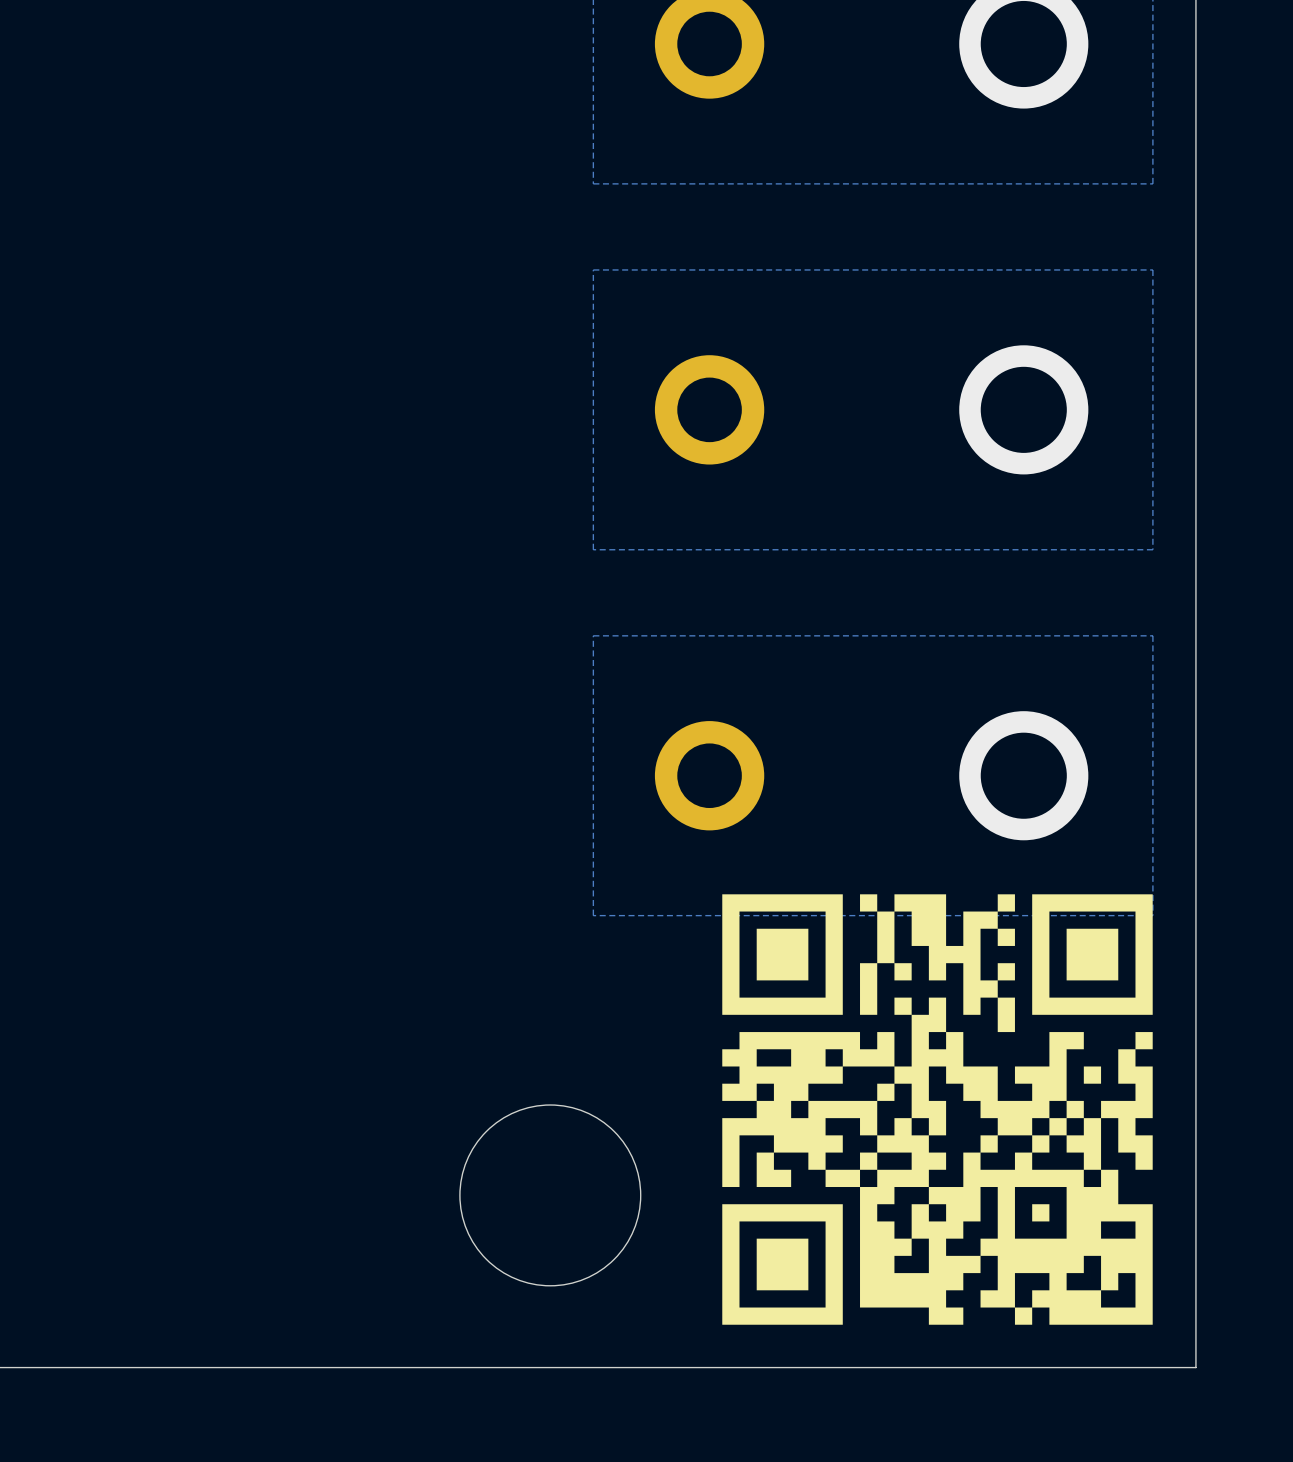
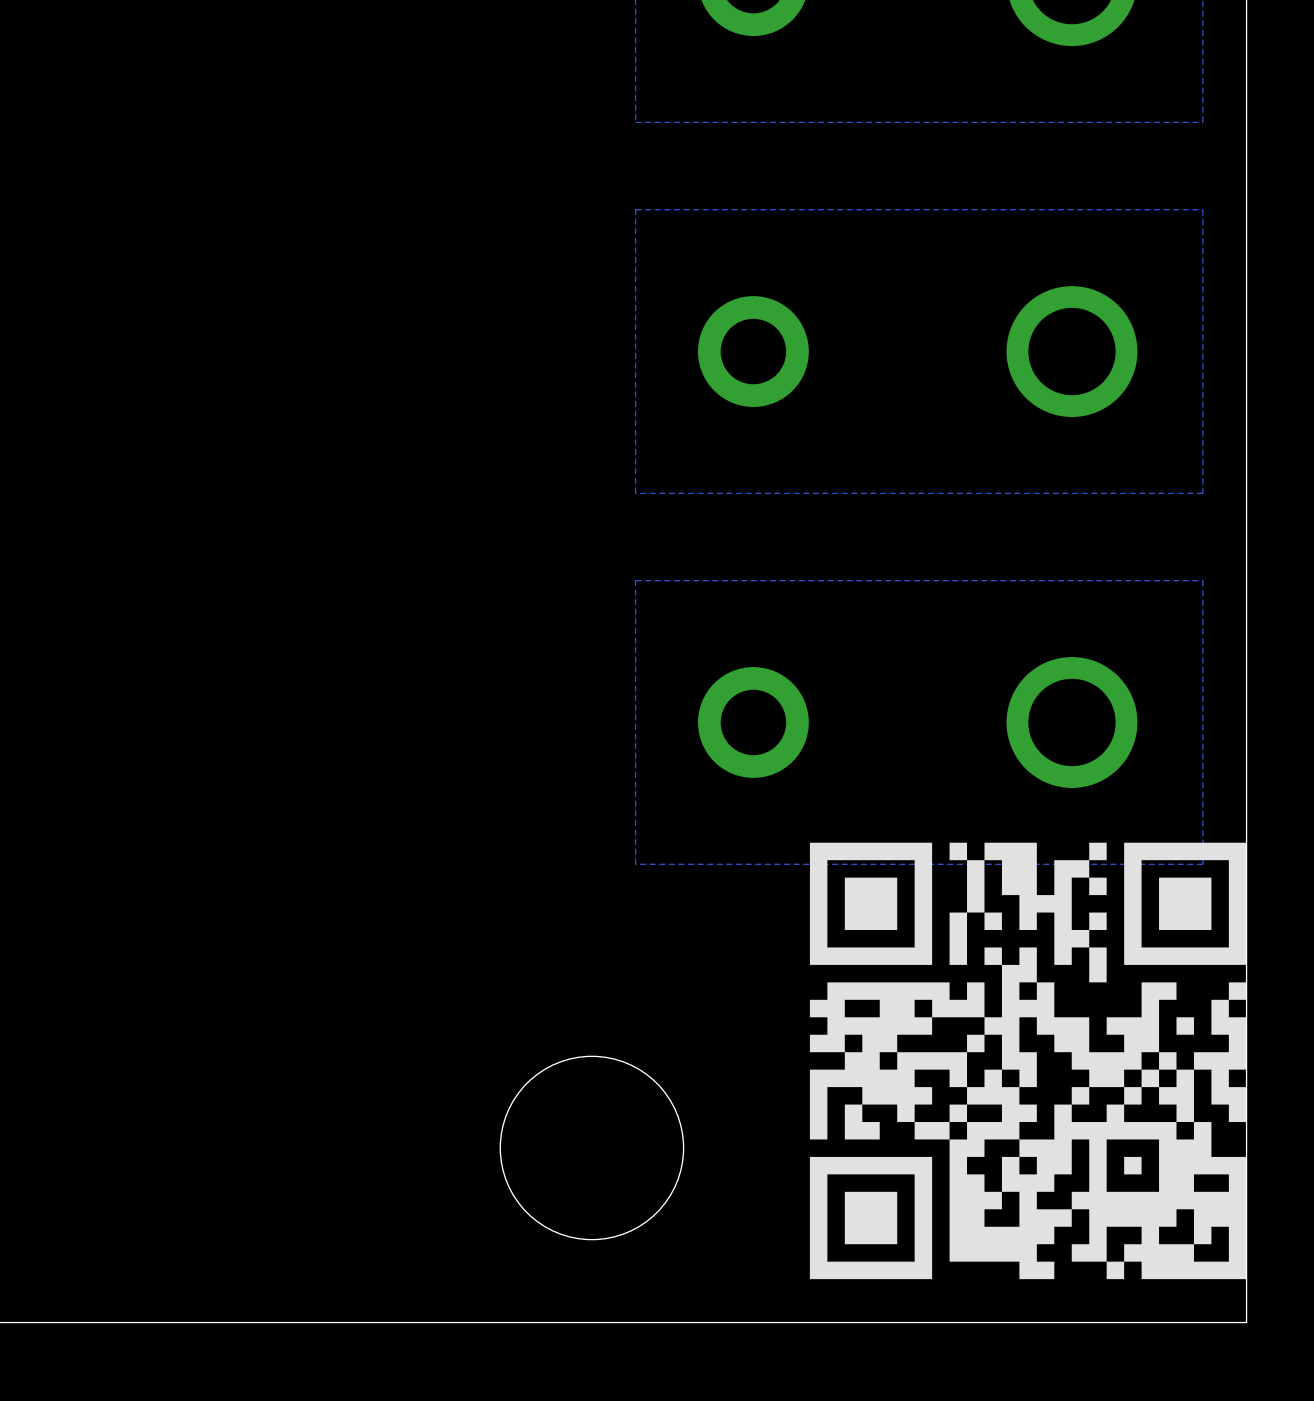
drawing position: (937, 1109) -> (1028, 1060)

